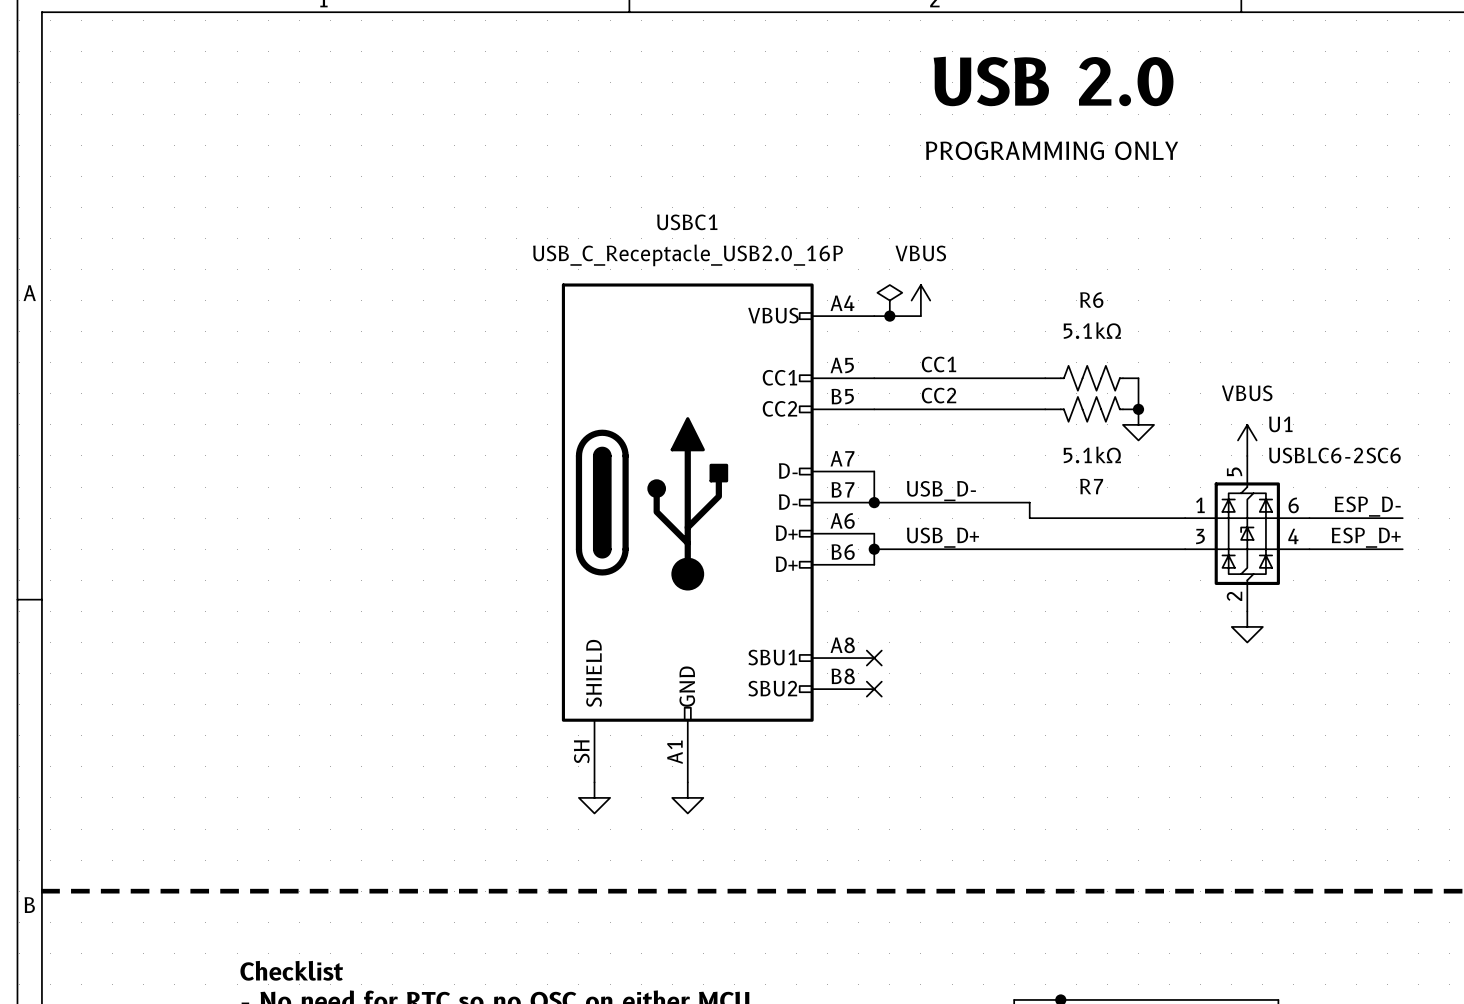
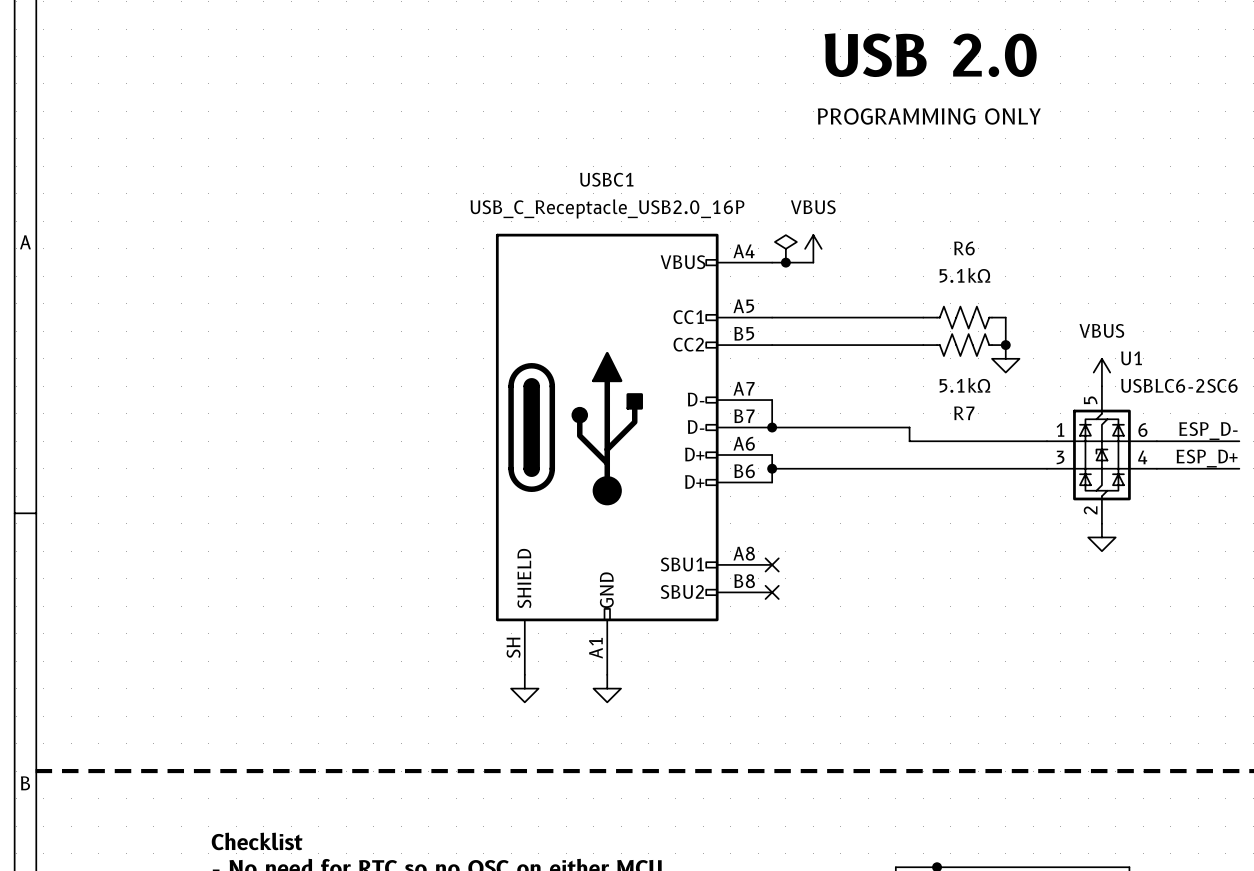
label: CC1 (939, 364) -> none
label: CC2 (939, 395) -> none
label: USB_D- (941, 491) -> none
label: USB_D+ (942, 537) -> none

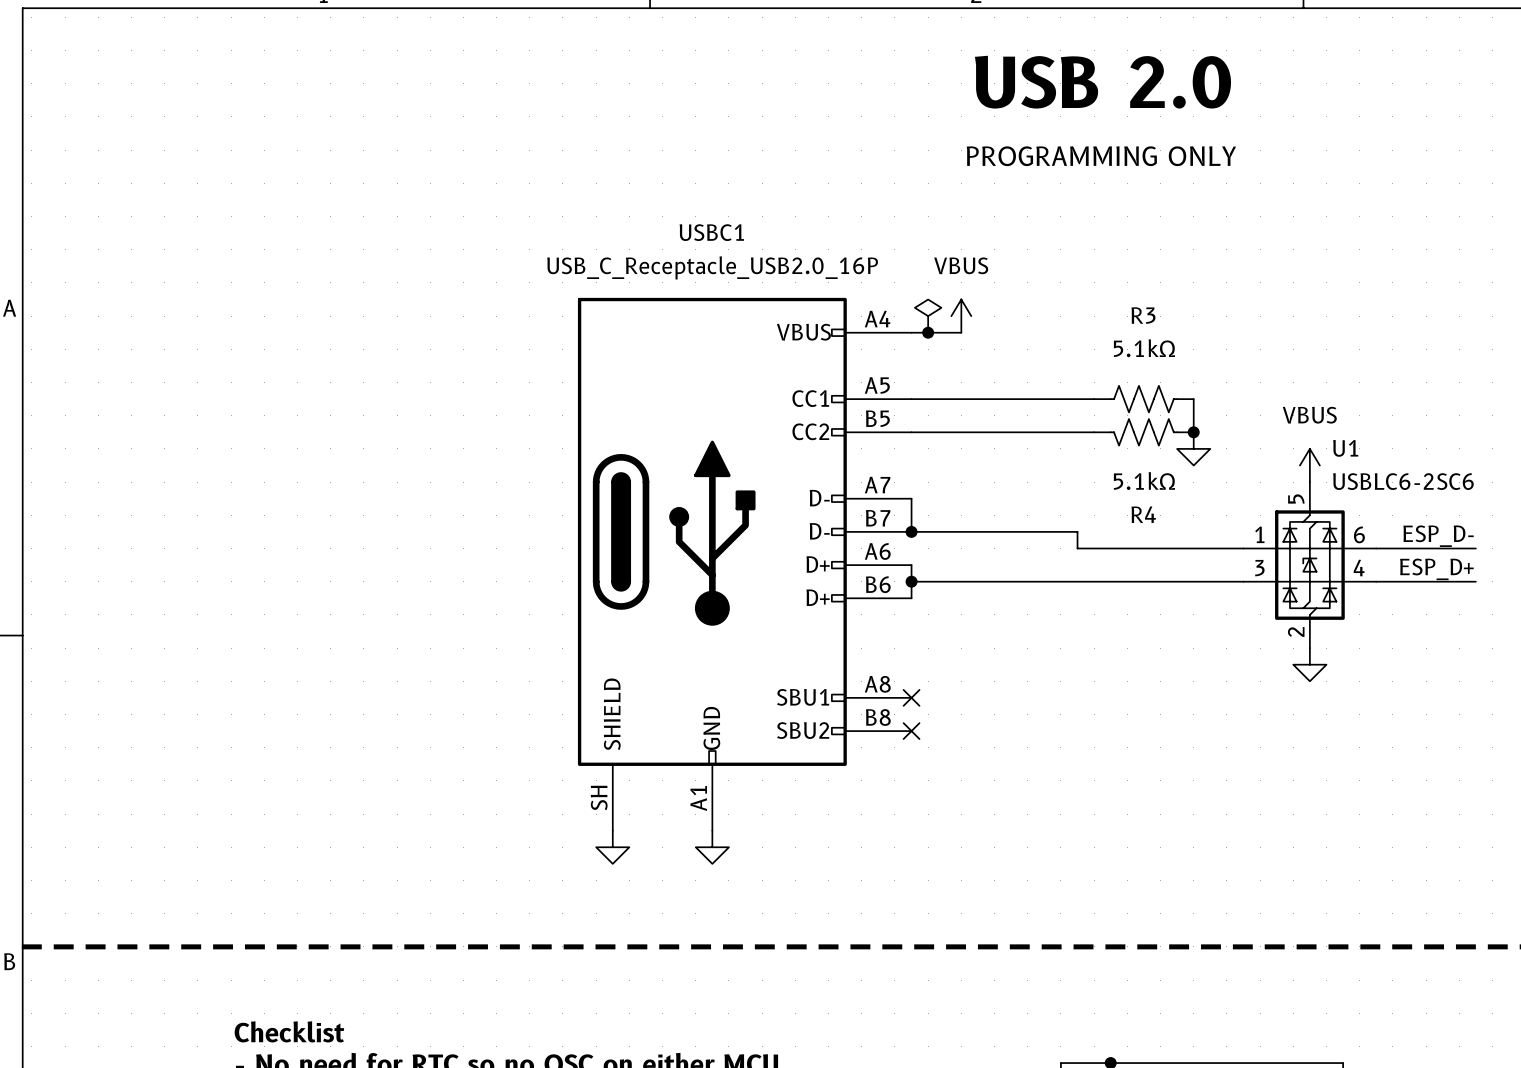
R6 name: R6 (964, 248) -> R3 (1143, 315)
R7 name: R7 (964, 413) -> R4 (1143, 514)

